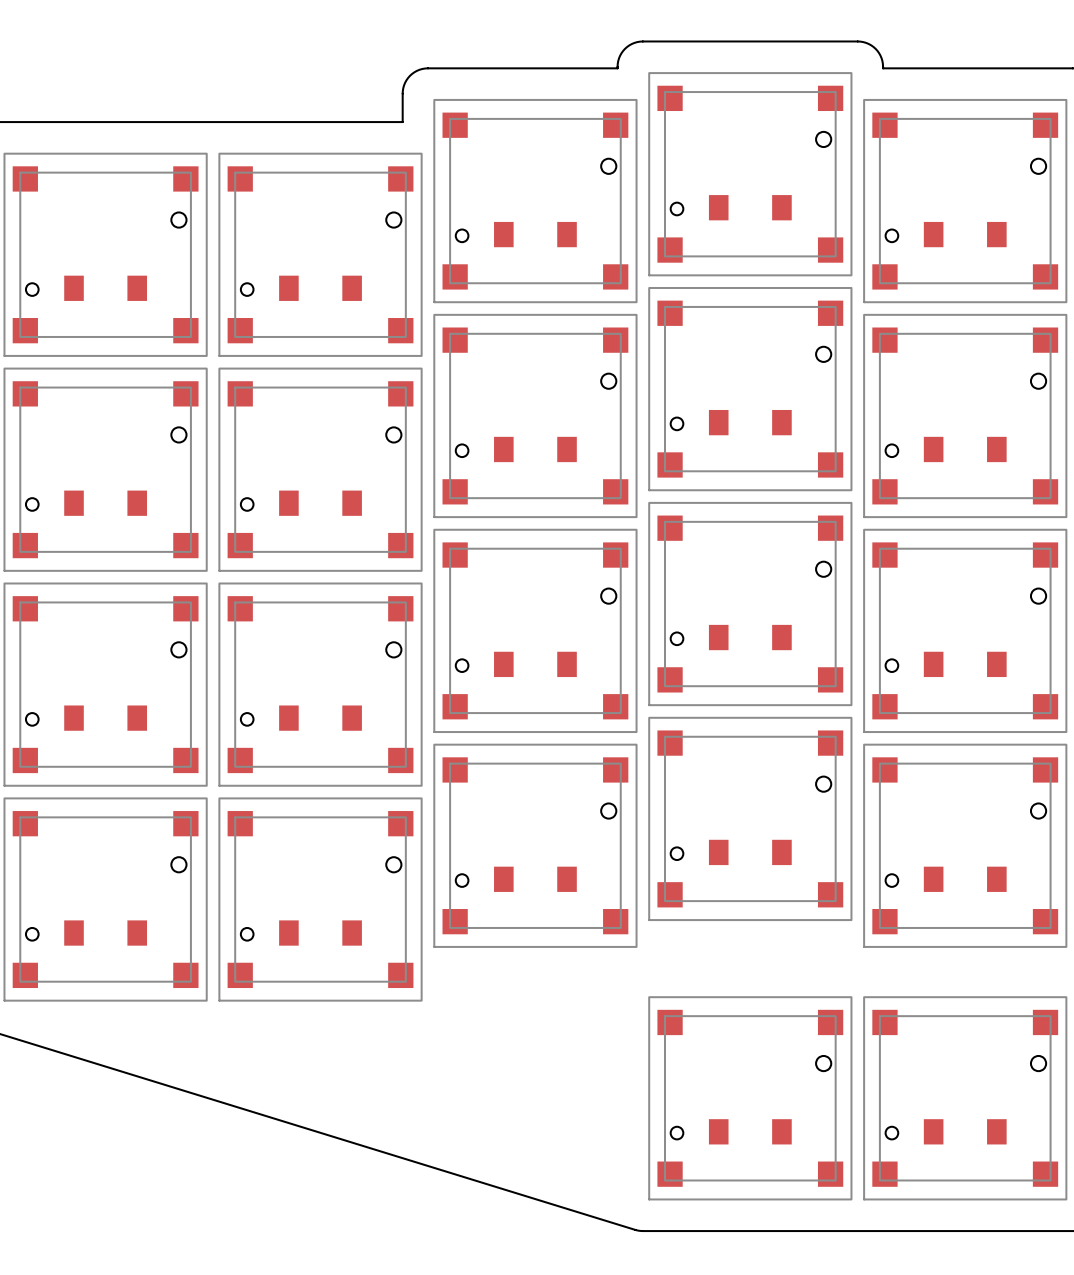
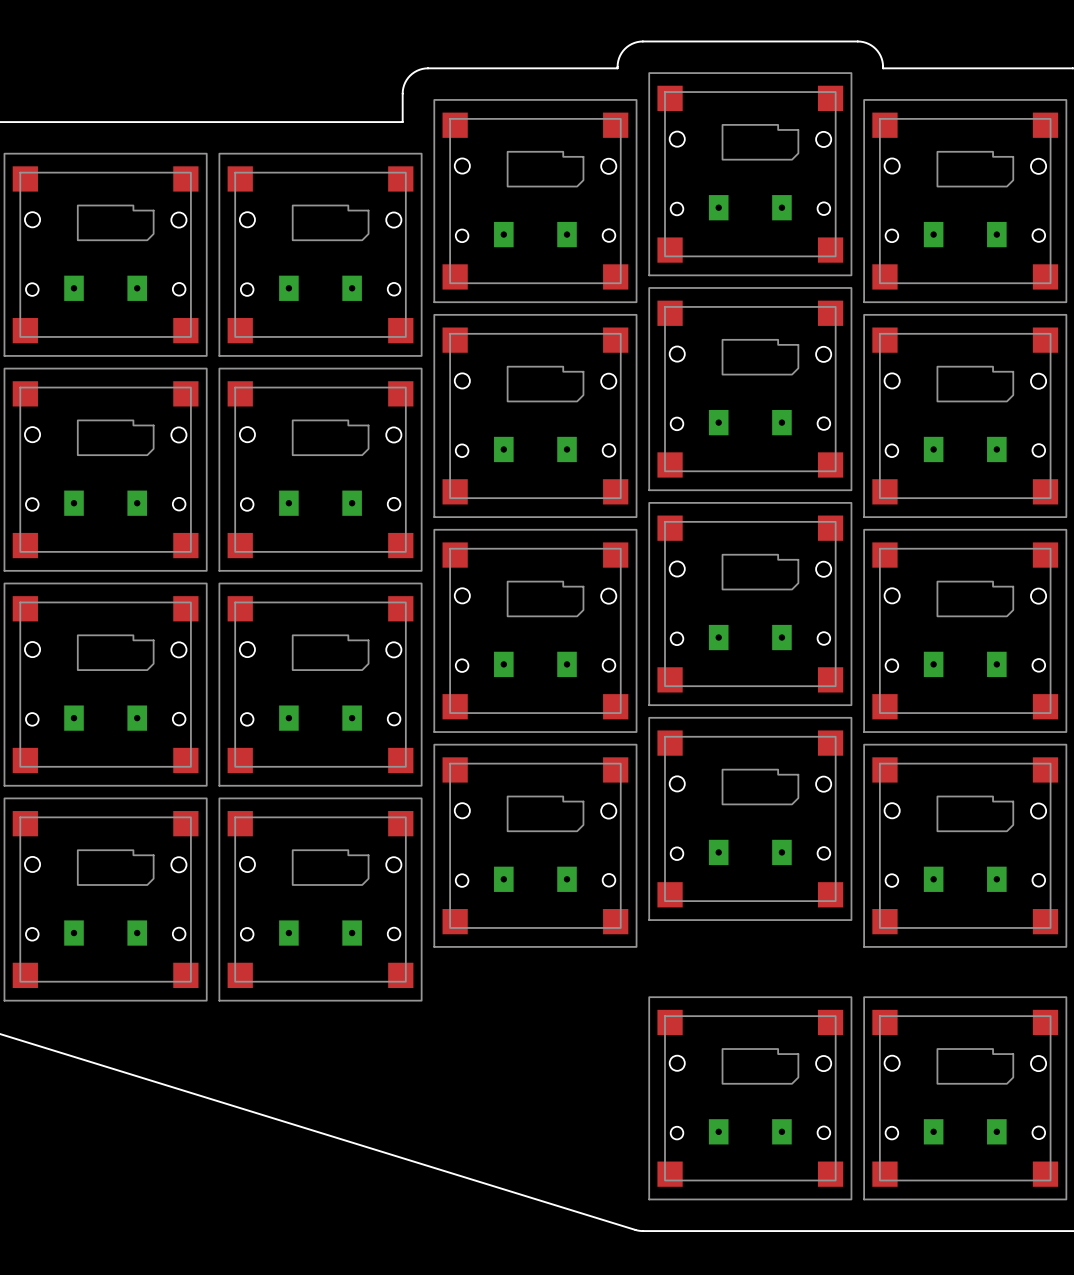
part footprint: [648, 72, 853, 276] -> [648, 72, 853, 276]
part footprint: [433, 99, 638, 303] -> [433, 99, 638, 303]
part footprint: [863, 99, 1068, 303] -> [863, 99, 1068, 303]
part footprint: [3, 153, 208, 357] -> [3, 153, 208, 357]
part footprint: [218, 153, 423, 357] -> [218, 153, 423, 357]
part footprint: [648, 287, 853, 491] -> [648, 287, 853, 491]
part footprint: [433, 314, 638, 518] -> [433, 314, 638, 518]
part footprint: [863, 314, 1068, 518] -> [863, 314, 1068, 518]
part footprint: [3, 367, 208, 572] -> [3, 367, 208, 572]
part footprint: [218, 367, 423, 572] -> [218, 367, 423, 572]
part footprint: [648, 502, 853, 706] -> [648, 502, 853, 706]
part footprint: [433, 529, 638, 733] -> [433, 529, 638, 733]
part footprint: [863, 529, 1068, 733] -> [863, 529, 1068, 733]
part footprint: [3, 582, 208, 787] -> [3, 582, 208, 787]
part footprint: [218, 582, 423, 787] -> [218, 582, 423, 787]
part footprint: [648, 717, 853, 921] -> [648, 717, 853, 921]
part footprint: [433, 744, 638, 948] -> [433, 744, 638, 948]
part footprint: [863, 744, 1068, 948] -> [863, 744, 1068, 948]
part footprint: [3, 797, 208, 1002] -> [3, 797, 208, 1002]
part footprint: [218, 797, 423, 1002] -> [218, 797, 423, 1002]
part footprint: [648, 996, 853, 1201] -> [648, 996, 853, 1201]
part footprint: [863, 996, 1068, 1201] -> [863, 996, 1068, 1201]

